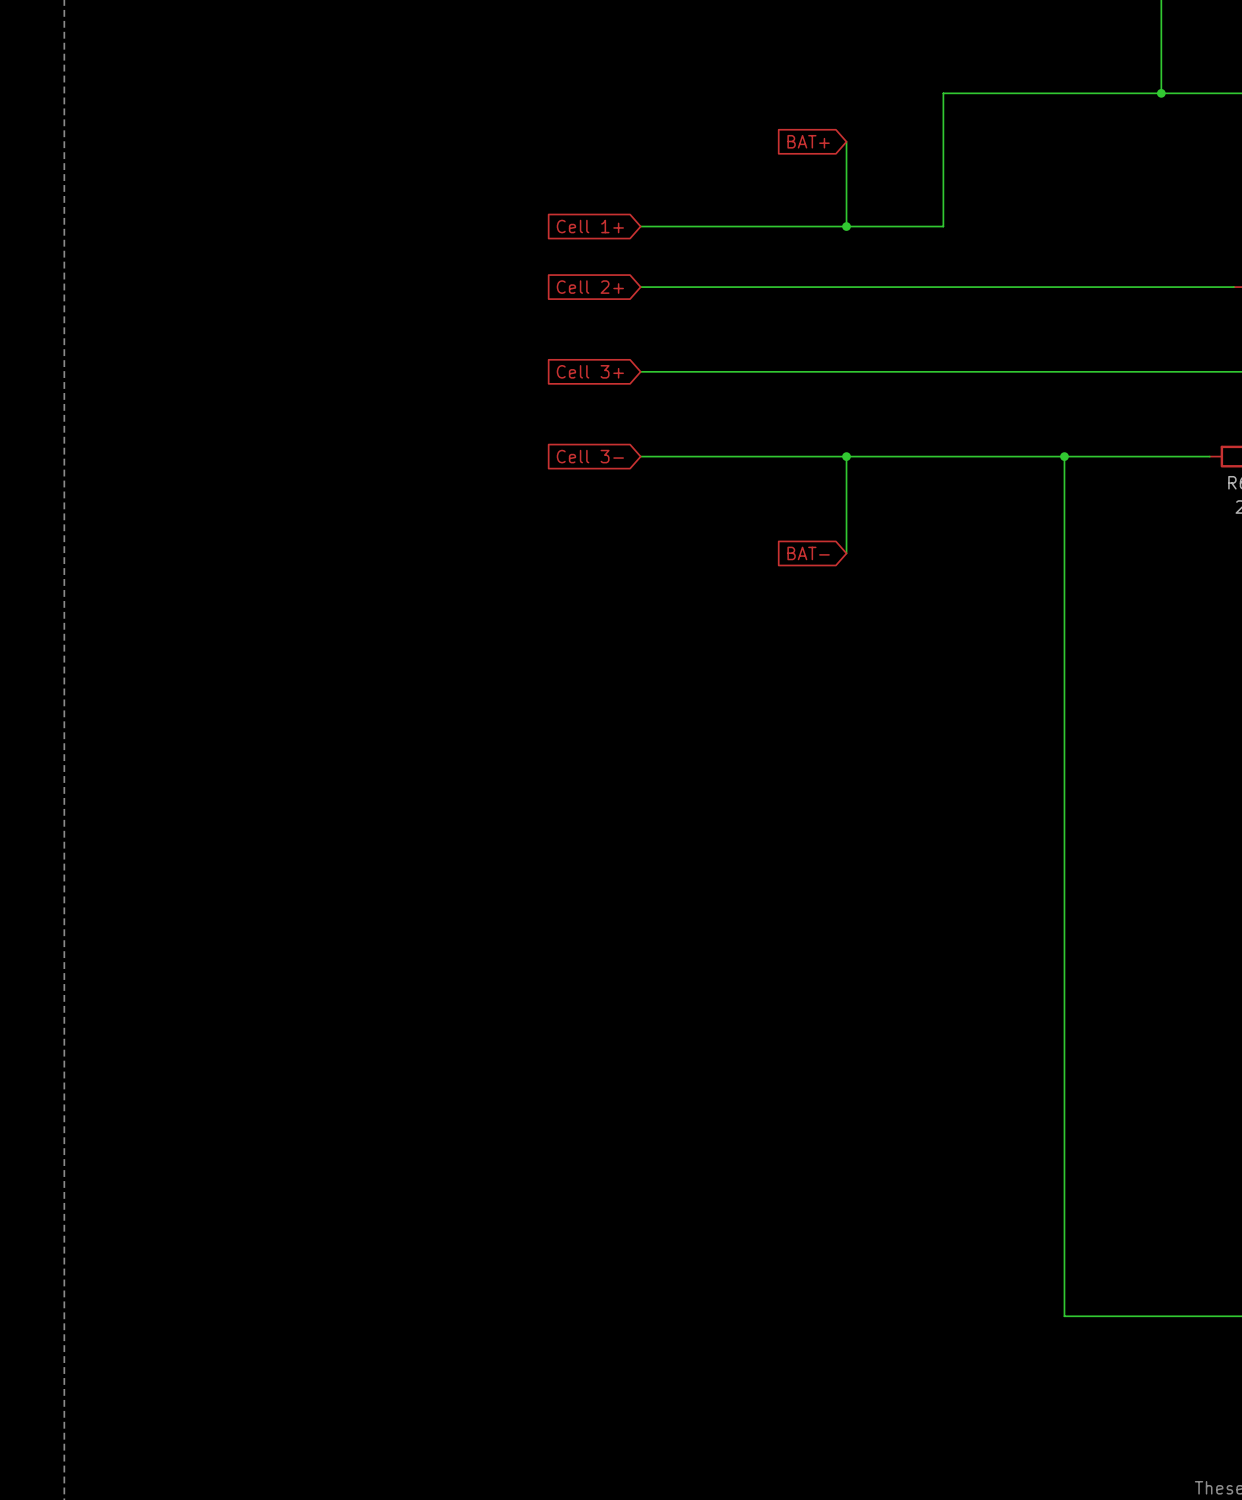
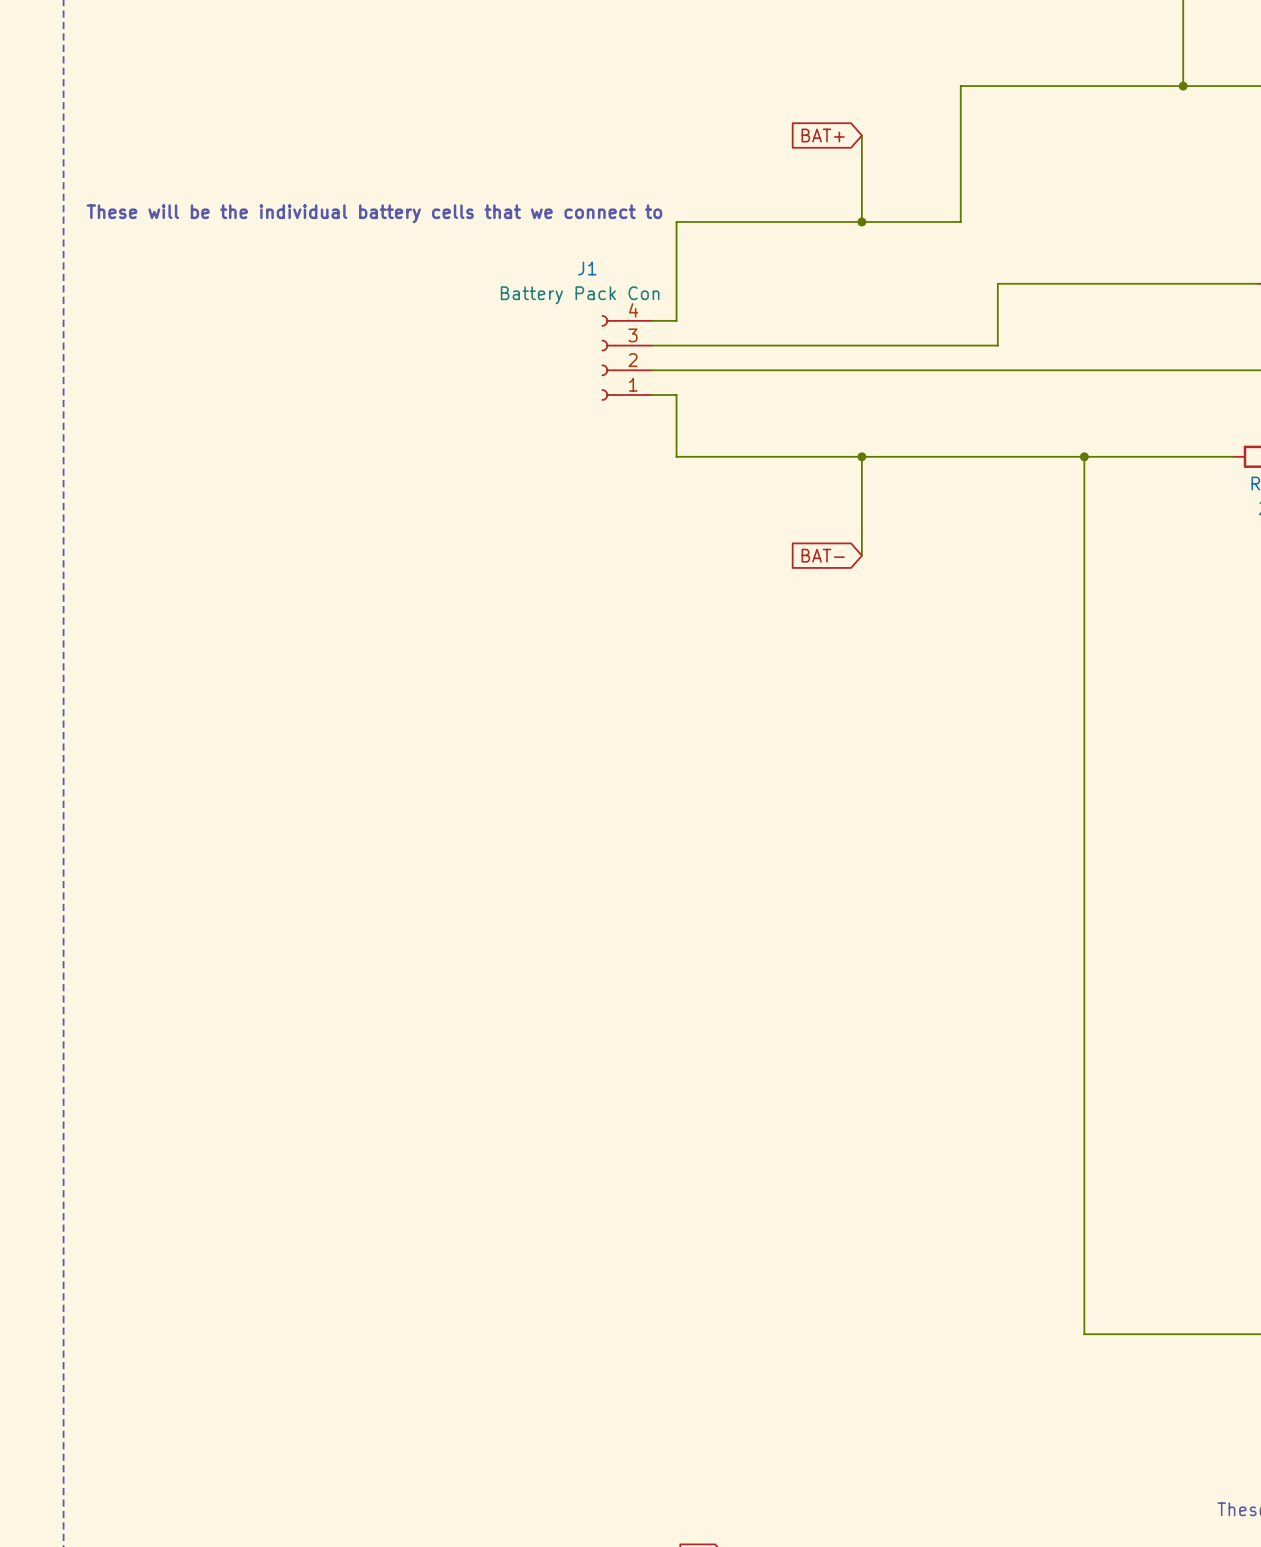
text: none -> These will be the individual battery cells that we connect to (374, 213)
global label: Cell 1+ (590, 226) -> none
wire: (640, 226) (664, 226) -> (651, 320) (676, 320) (676, 222)
global label: Cell 2+ (590, 287) -> none
wire: (640, 287) (979, 287) -> (651, 345) (997, 345) (997, 283)
J1: none -> Battery Pack Con (626, 357)
global label: Cell 3+ (590, 371) -> none
global label: Cell 3- (590, 456) -> none
wire: (640, 456) (664, 456) -> (651, 395) (676, 395) (676, 456)

